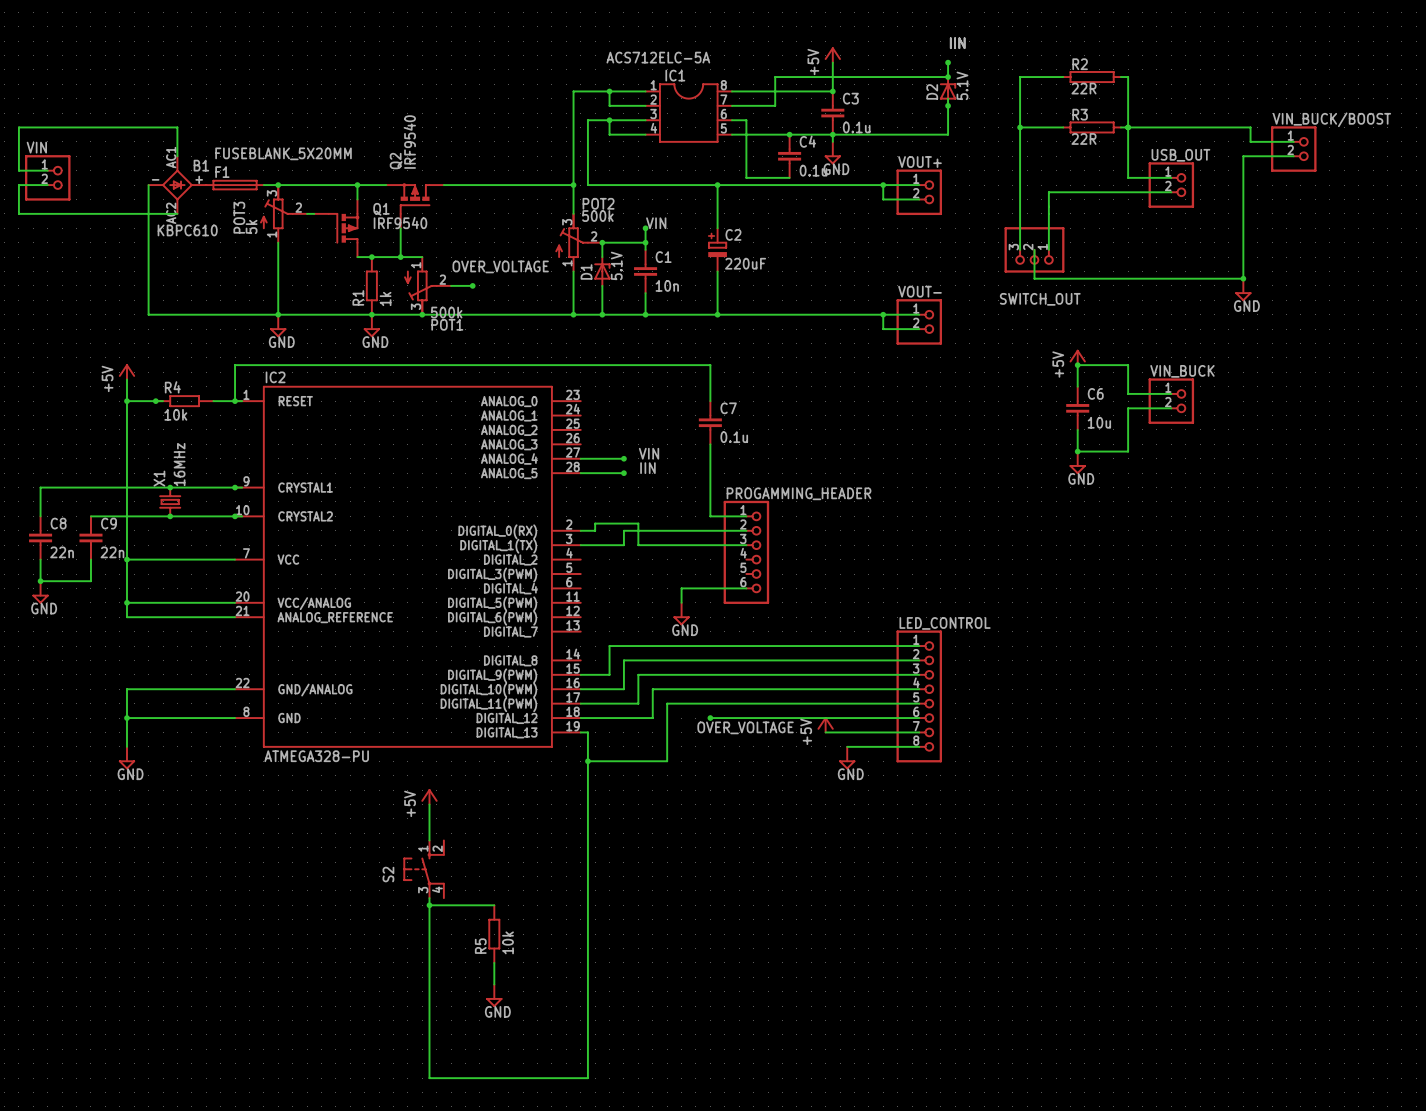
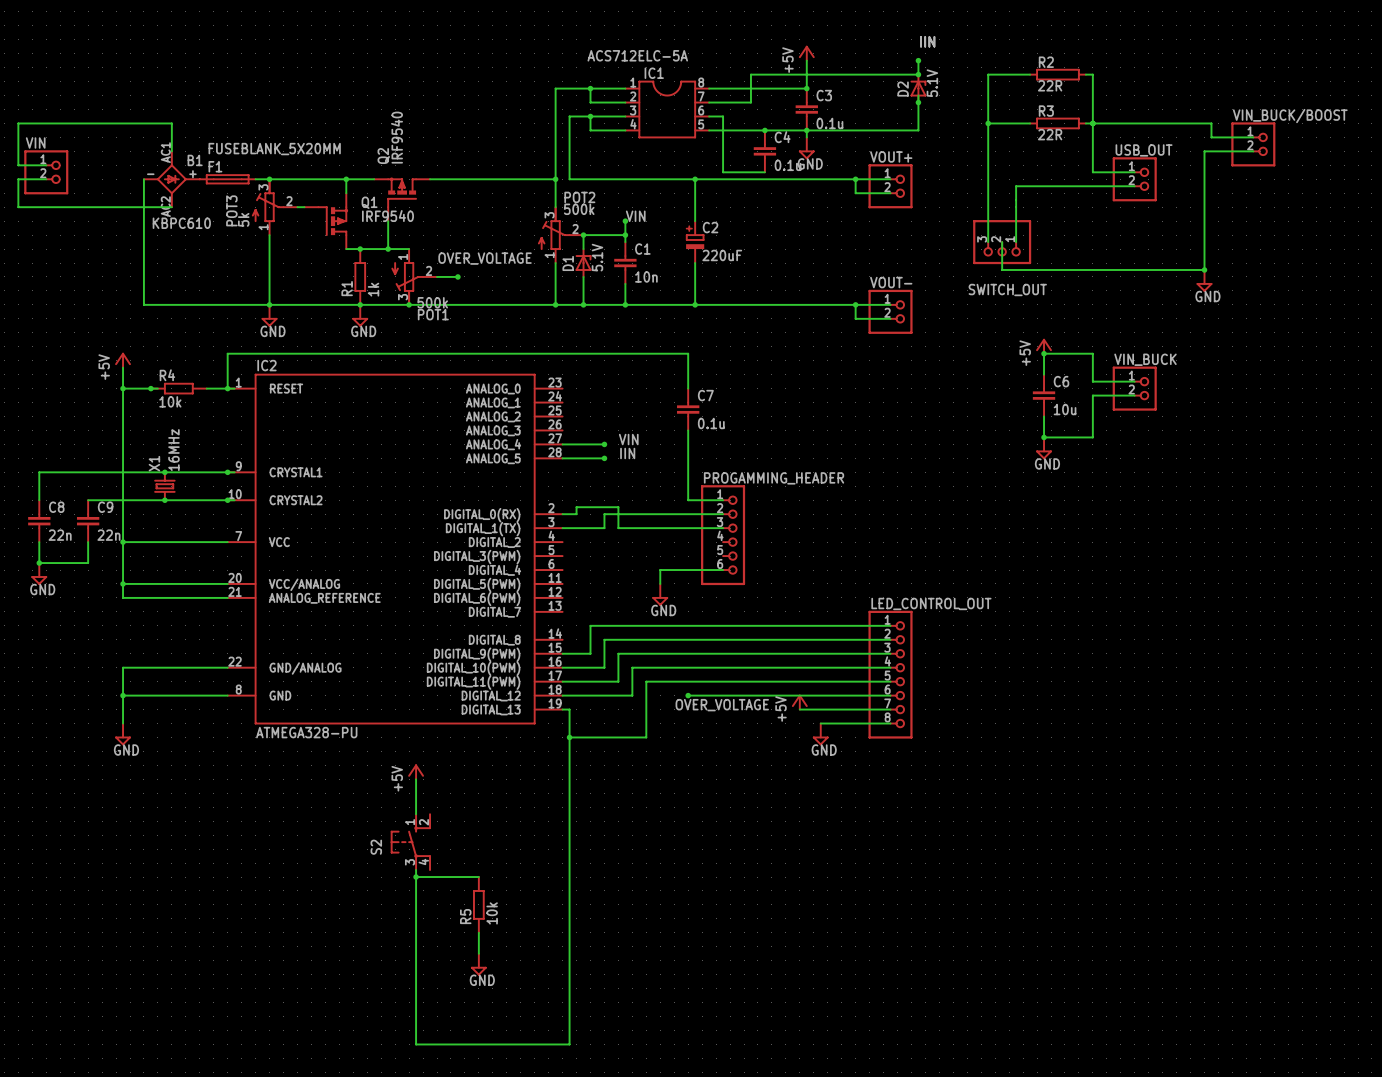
LED_CONTROL name: LED_CONTROL (945, 623) -> LED_CONTROL_OUT (931, 603)

